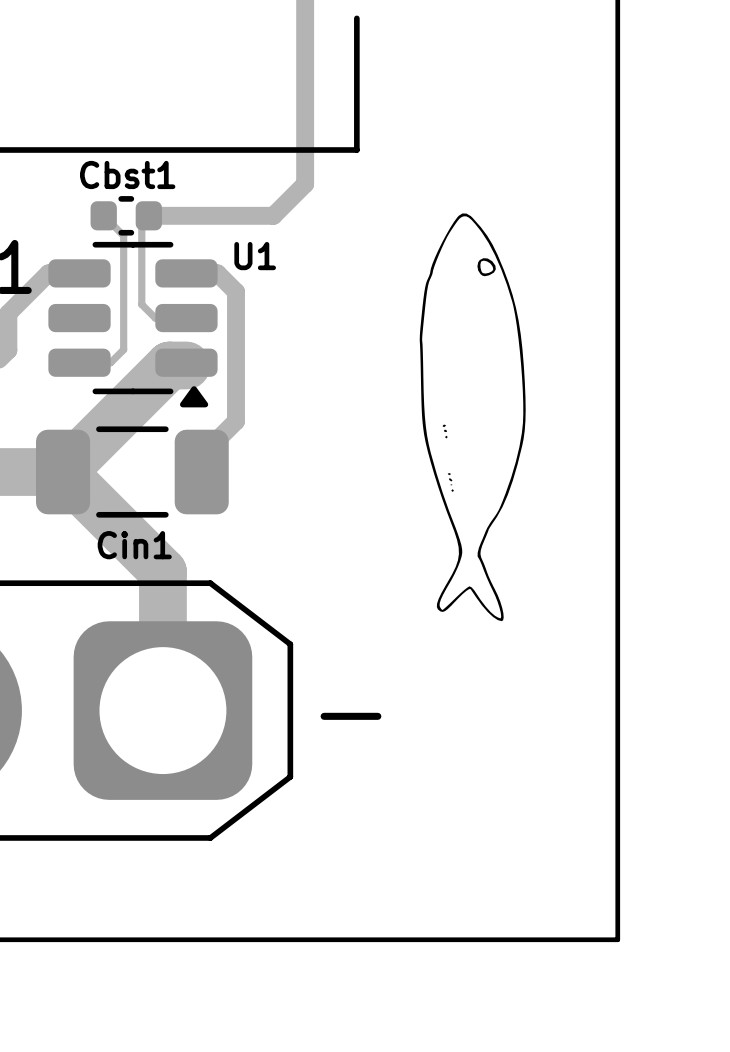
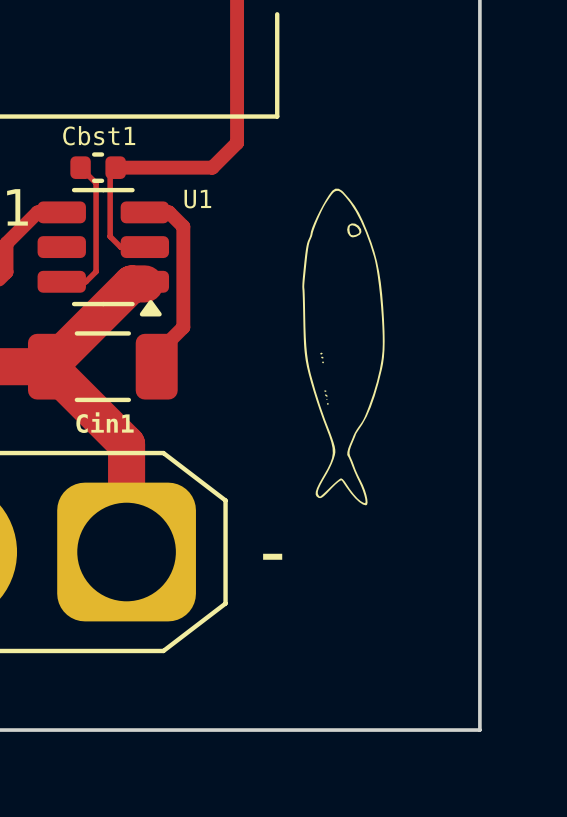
drawing position: (472, 417) -> (343, 347)

